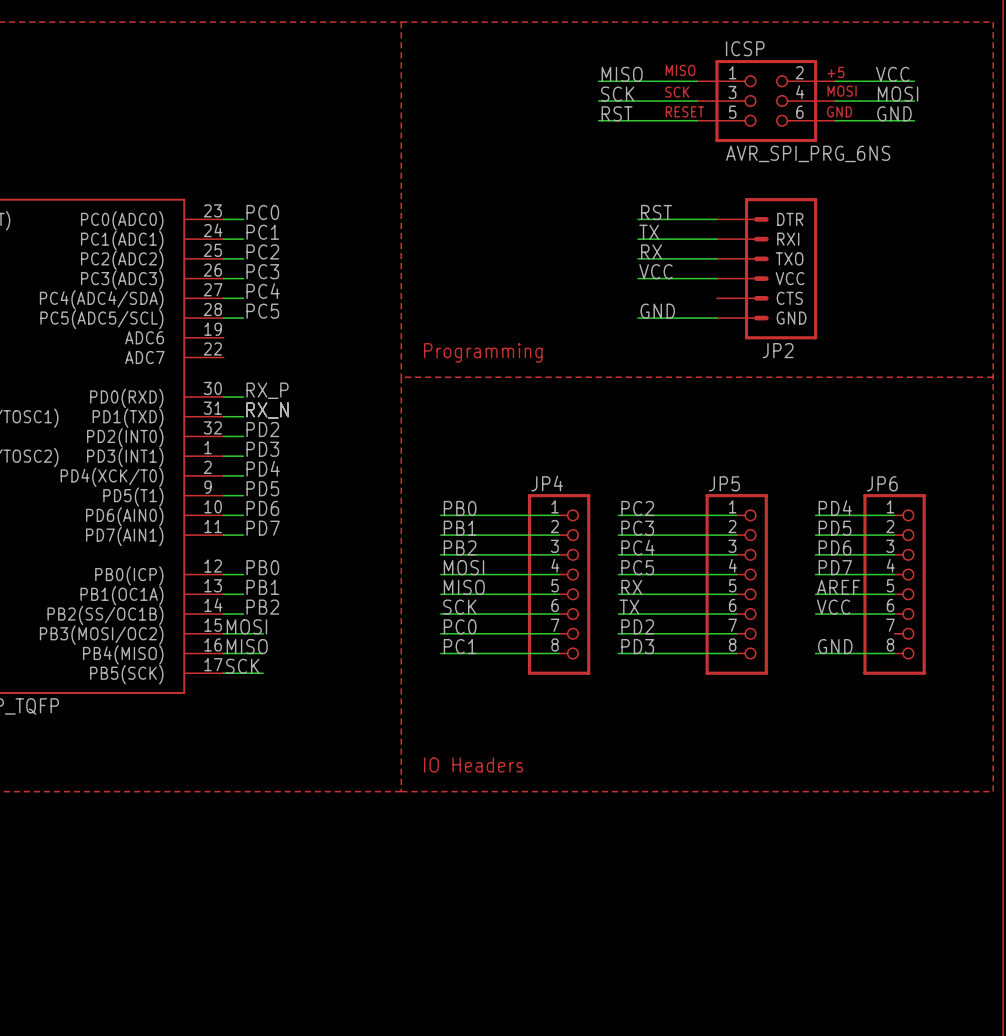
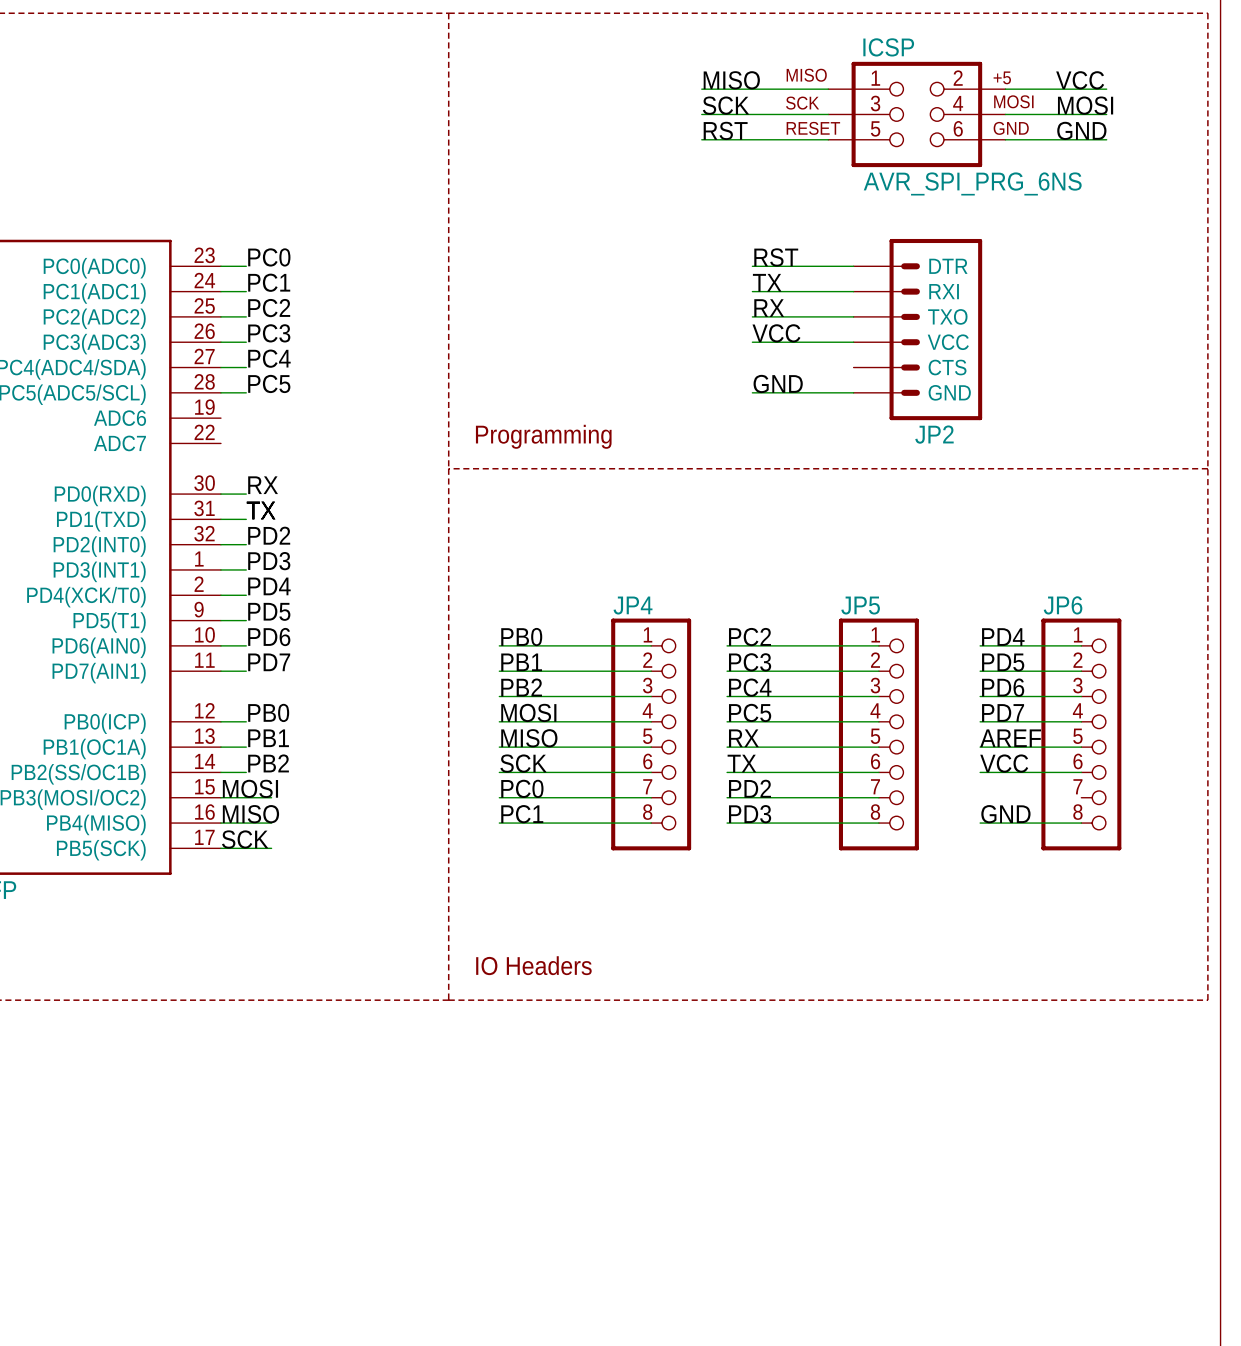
label: RX_P (267, 390) -> RX (263, 485)
label: RX_N (267, 410) -> TX (261, 510)

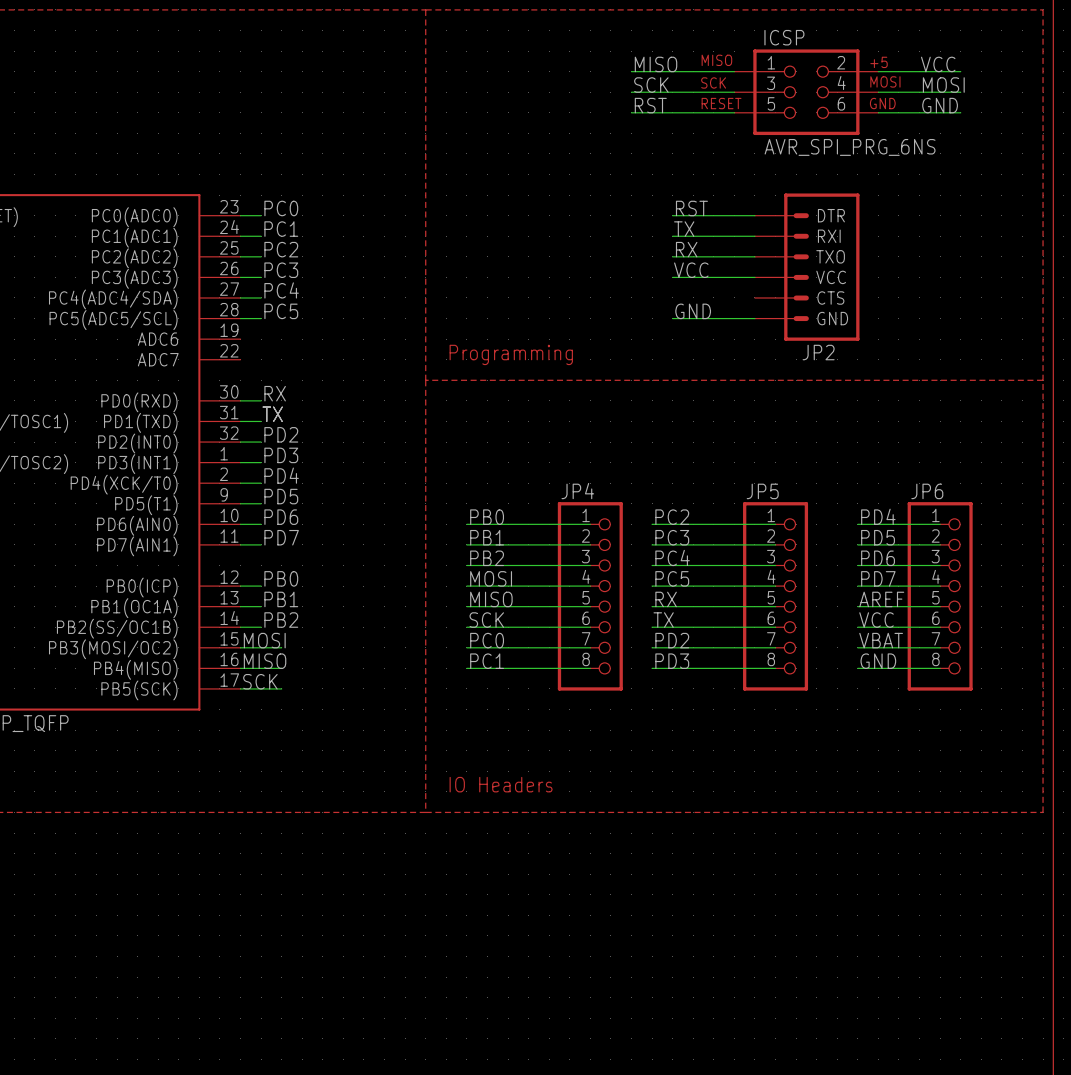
label: none -> VBAT (881, 640)
wire: none -> (857, 647) (940, 647)

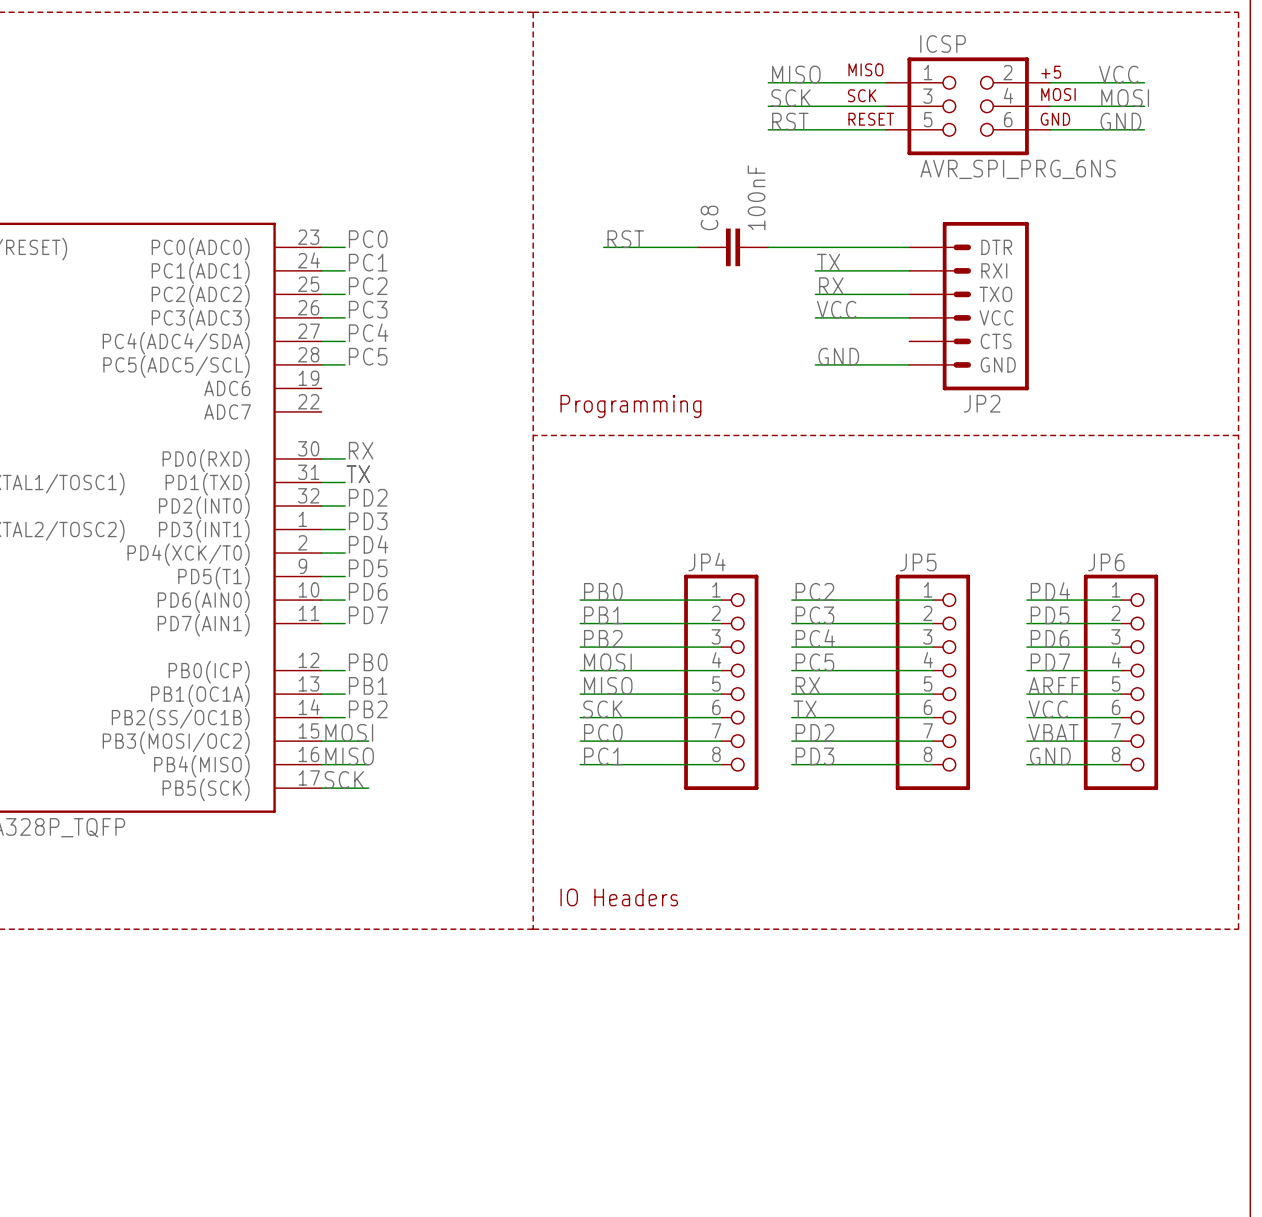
label position: RST (691, 208) -> RST (625, 239)
wire: none -> (603, 247) (697, 247)
C8: none -> 100nF (733, 247)
wire: none -> (768, 247) (815, 247)

